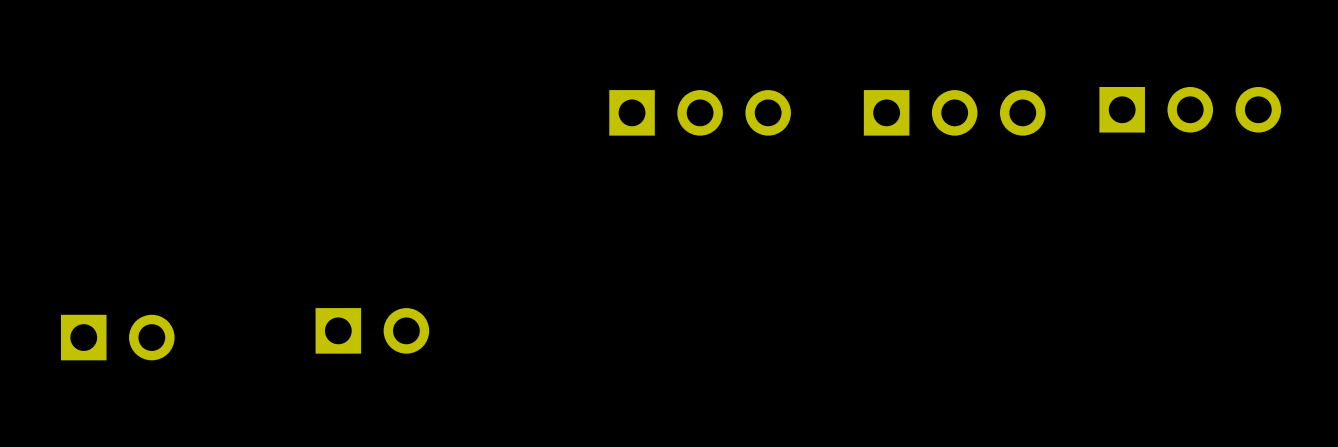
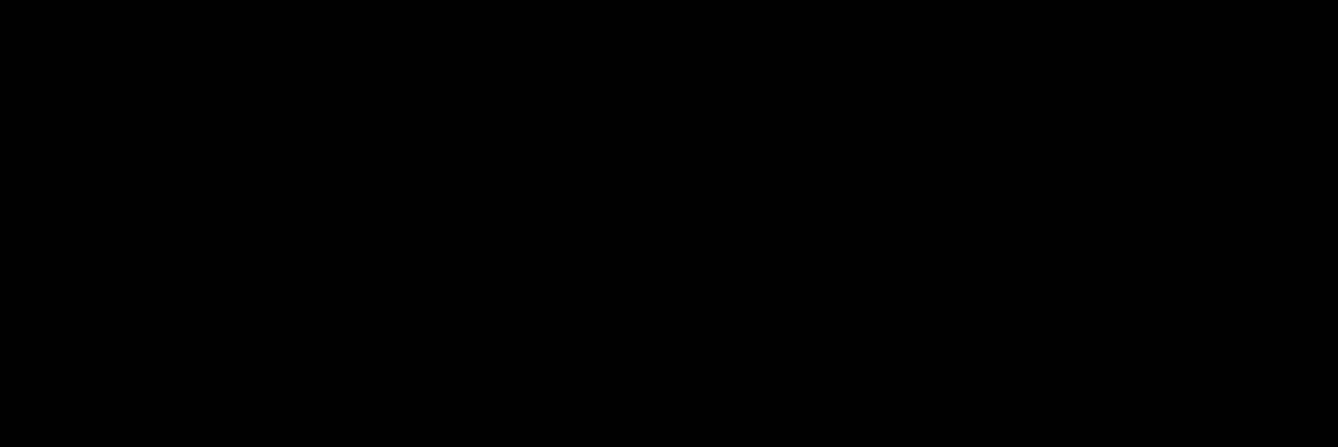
part: (1190, 109) -> none
part: (700, 112) -> none
part: (954, 112) -> none
part: (372, 330) -> none
part: (117, 337) -> none

